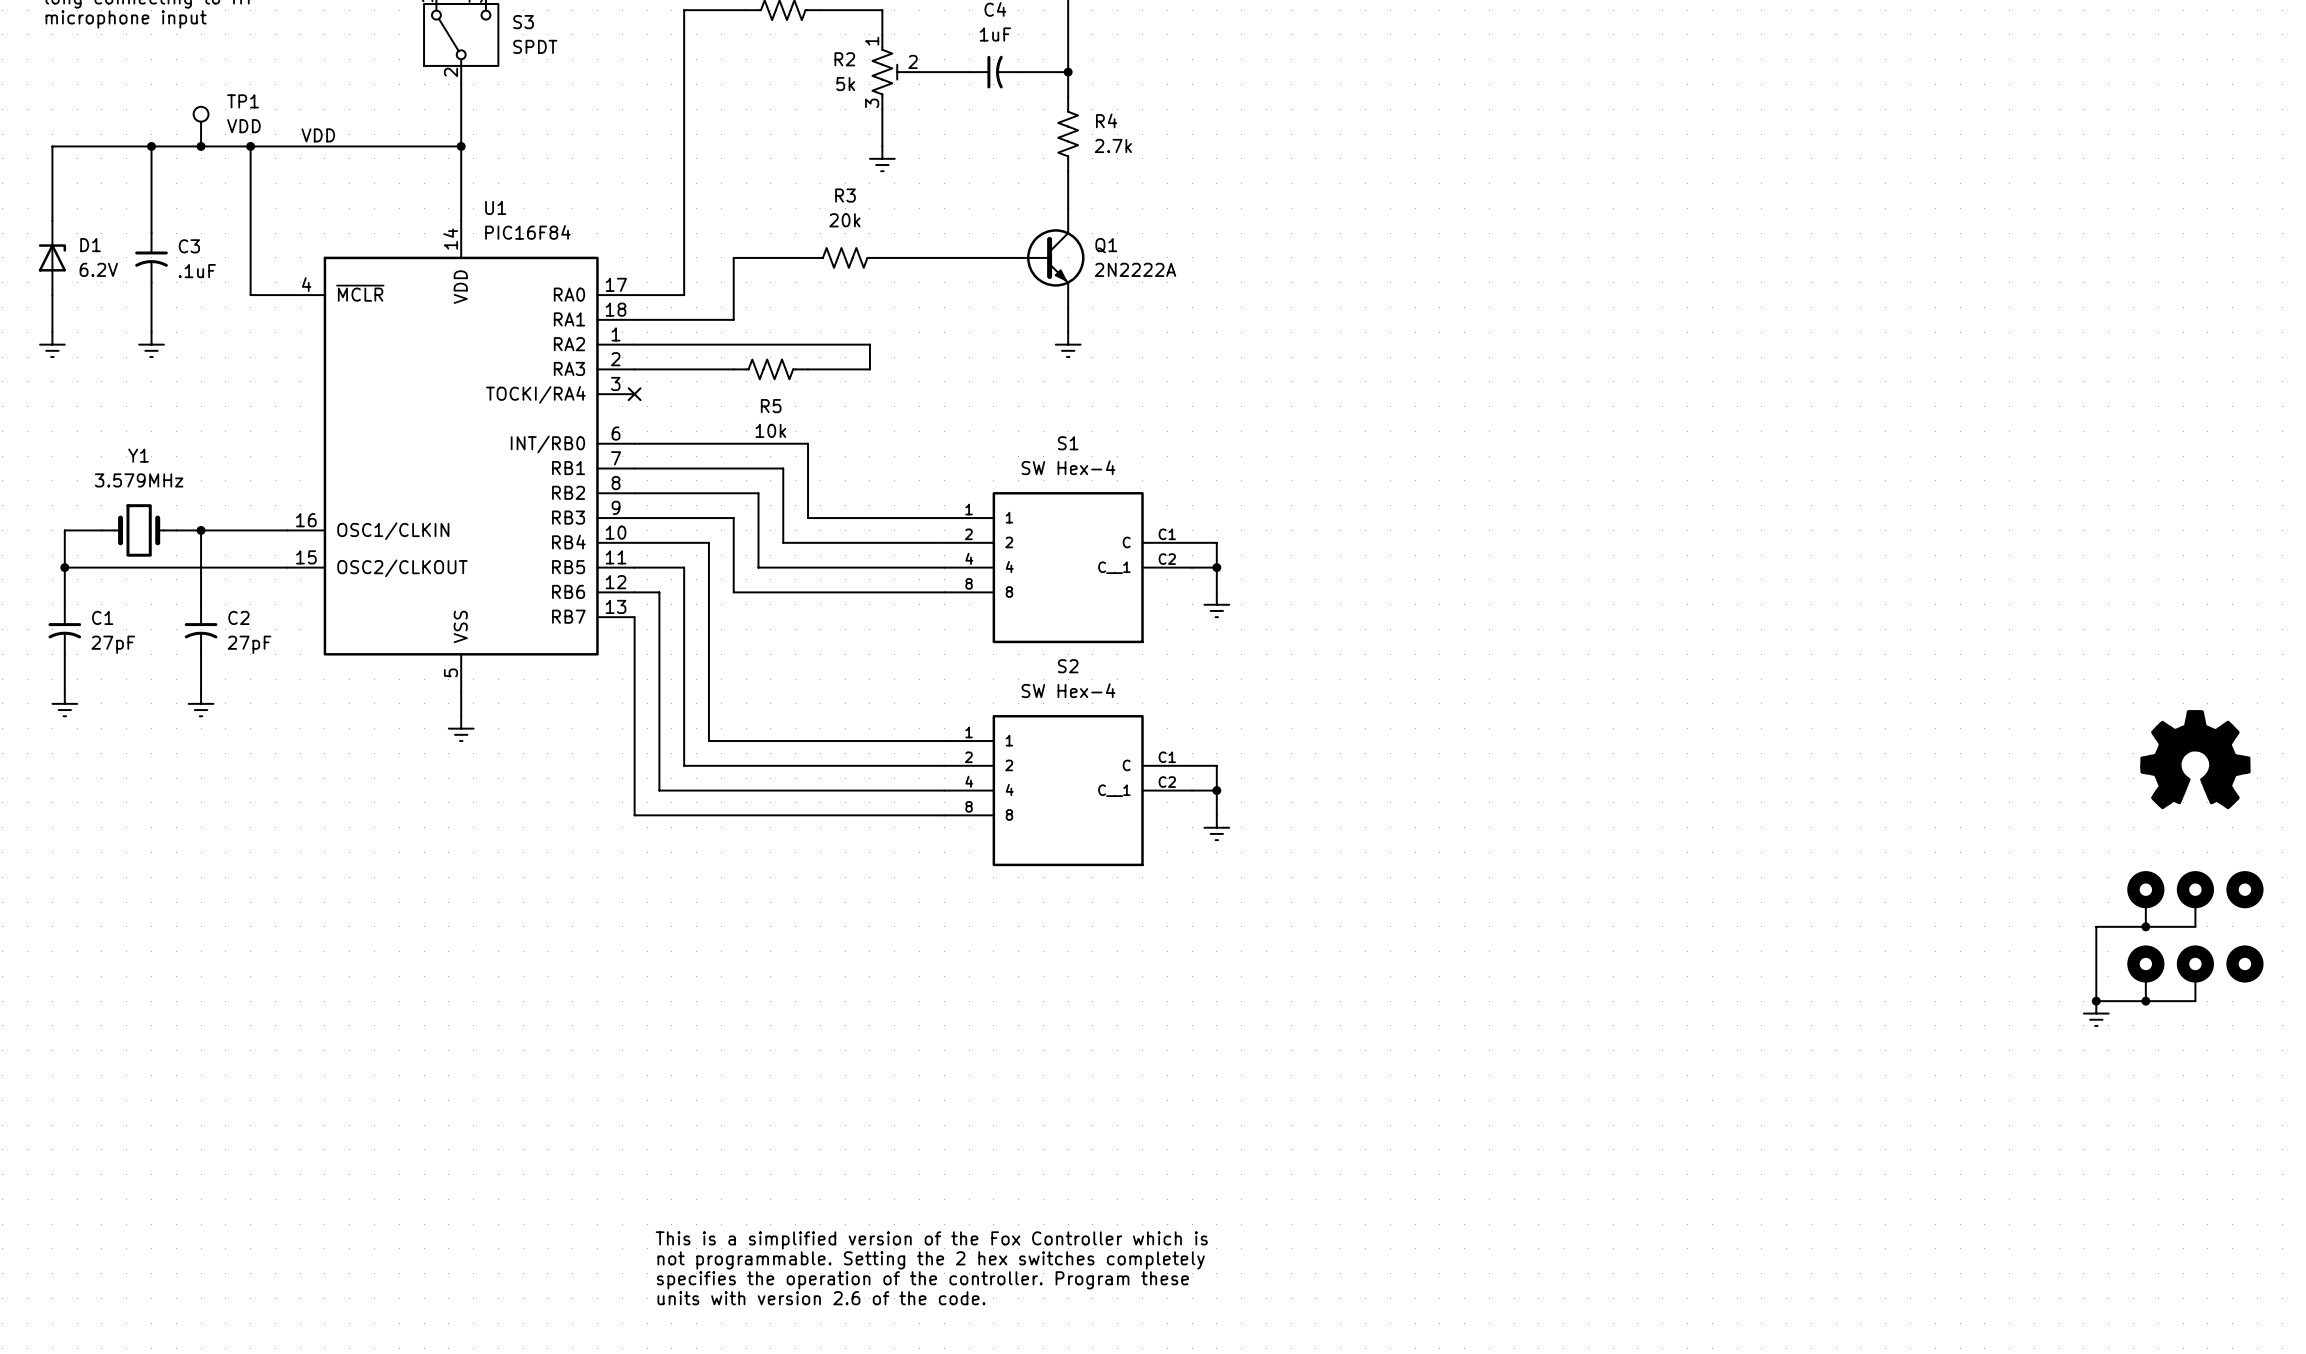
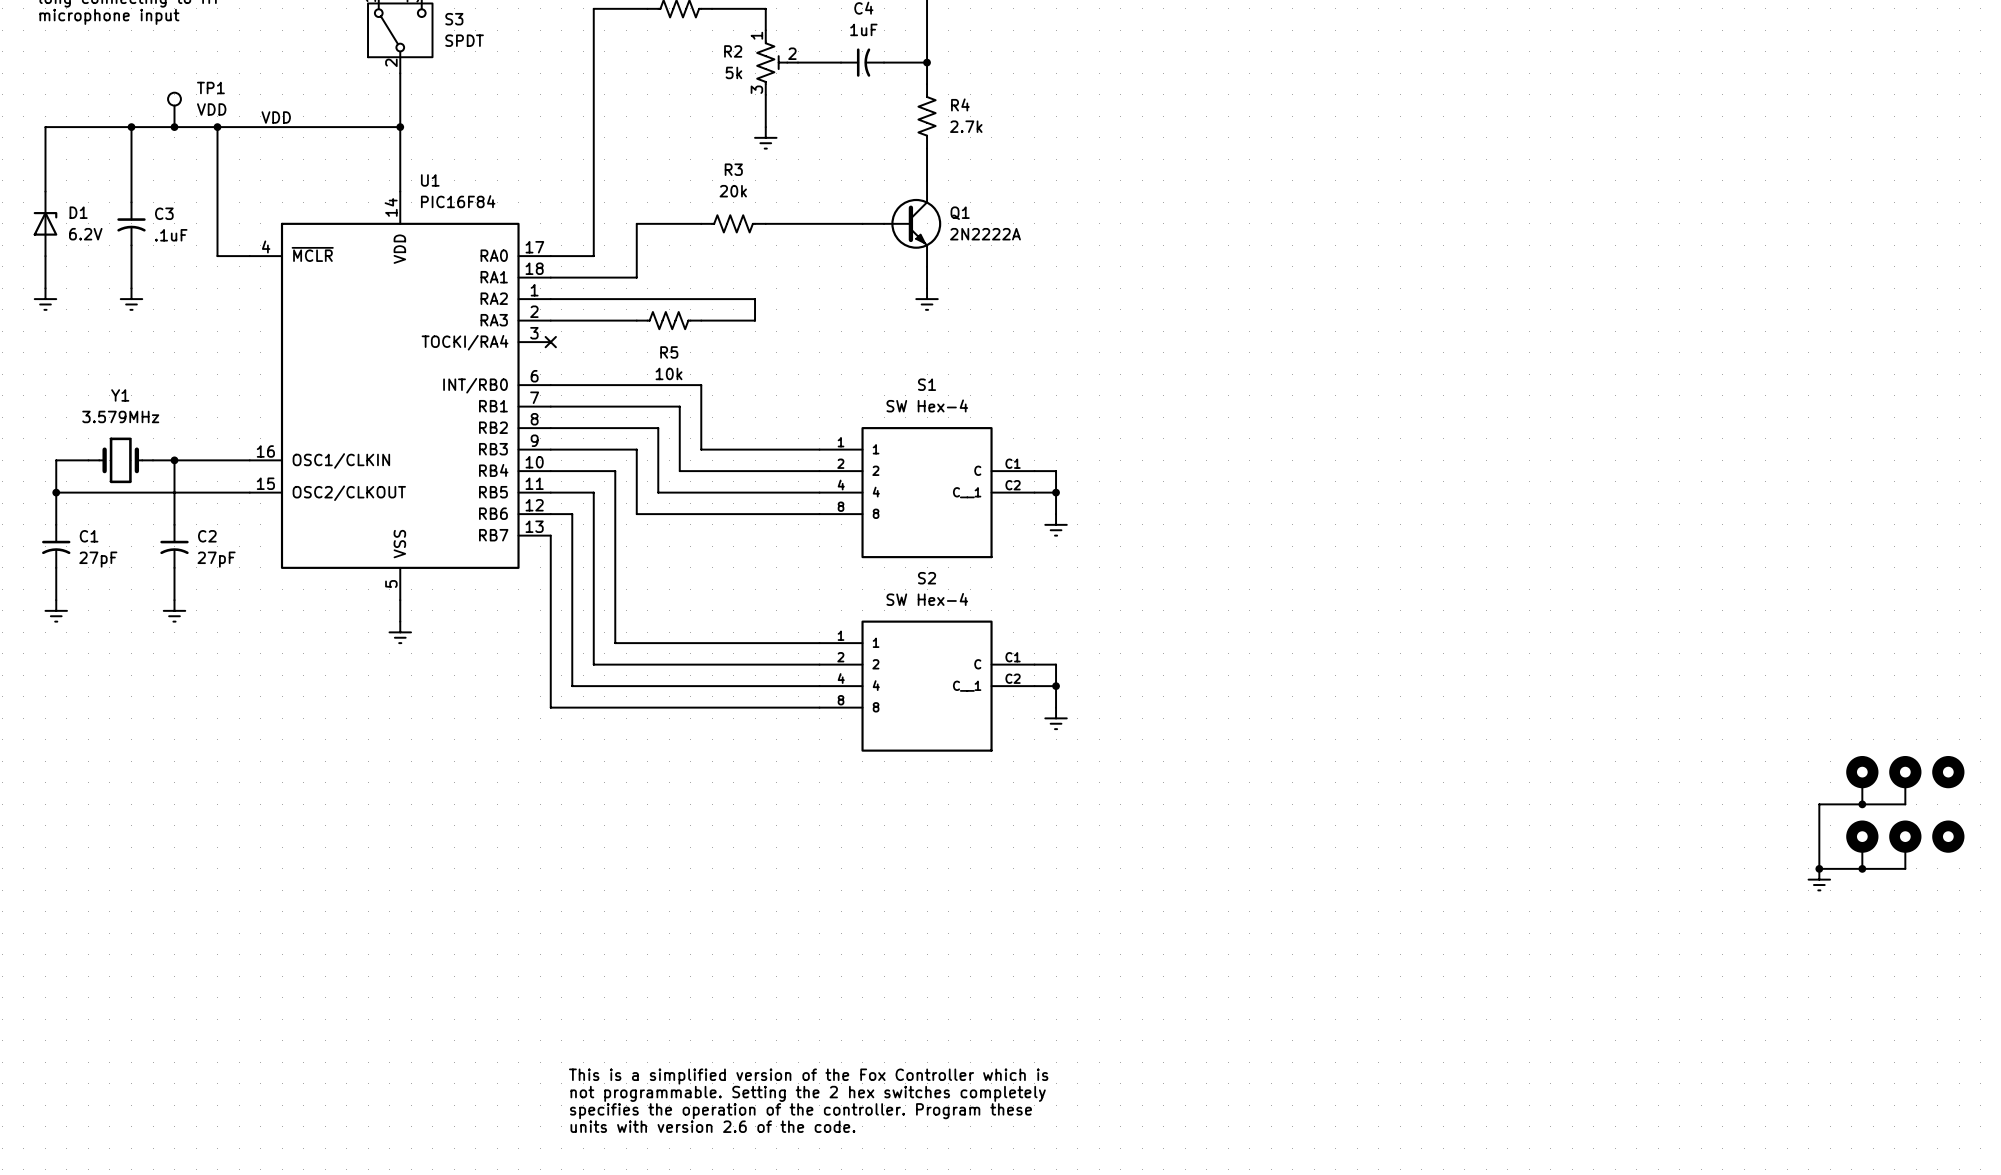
part: (2195, 759) -> none

